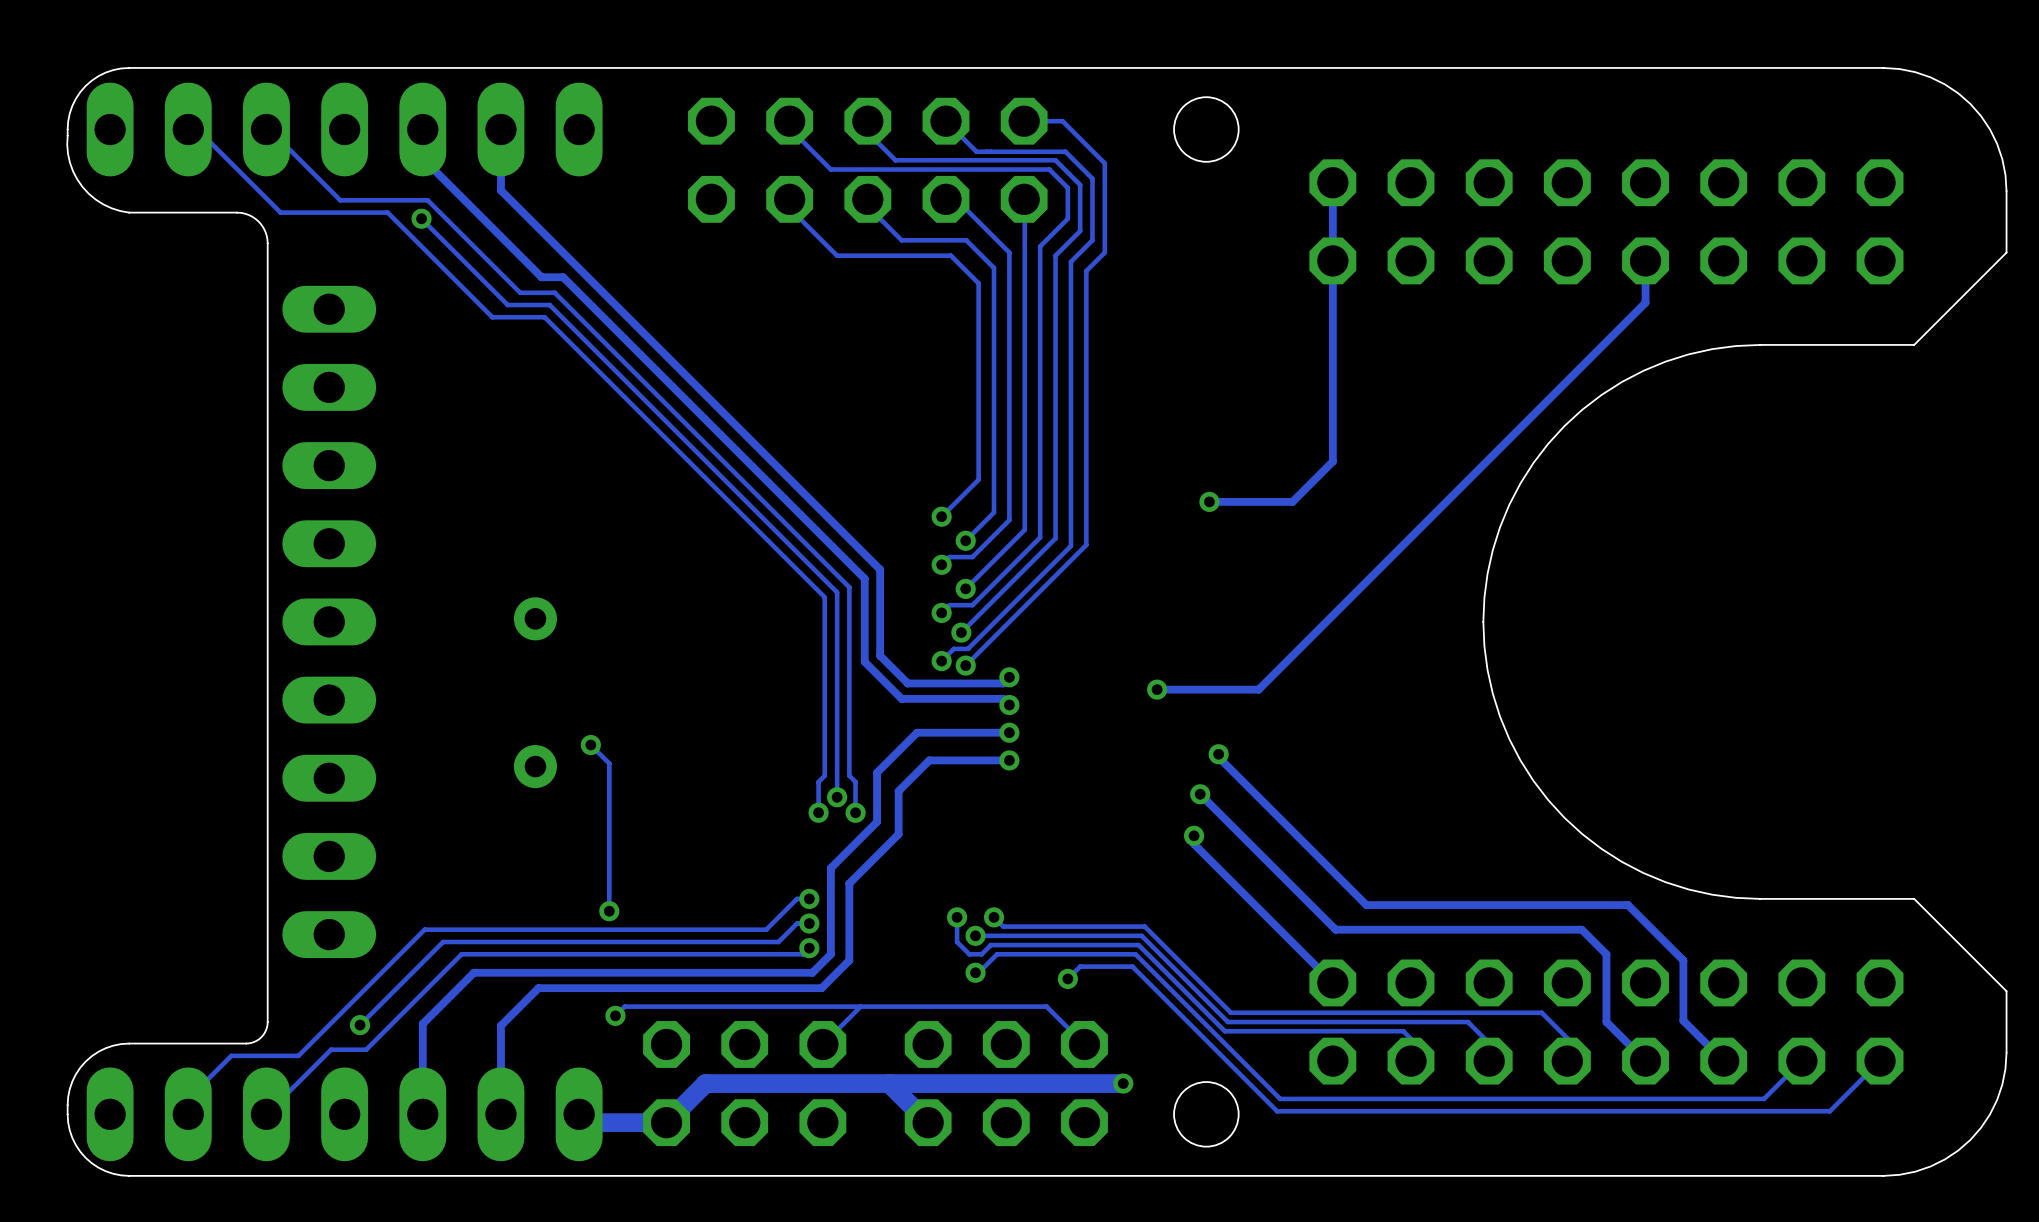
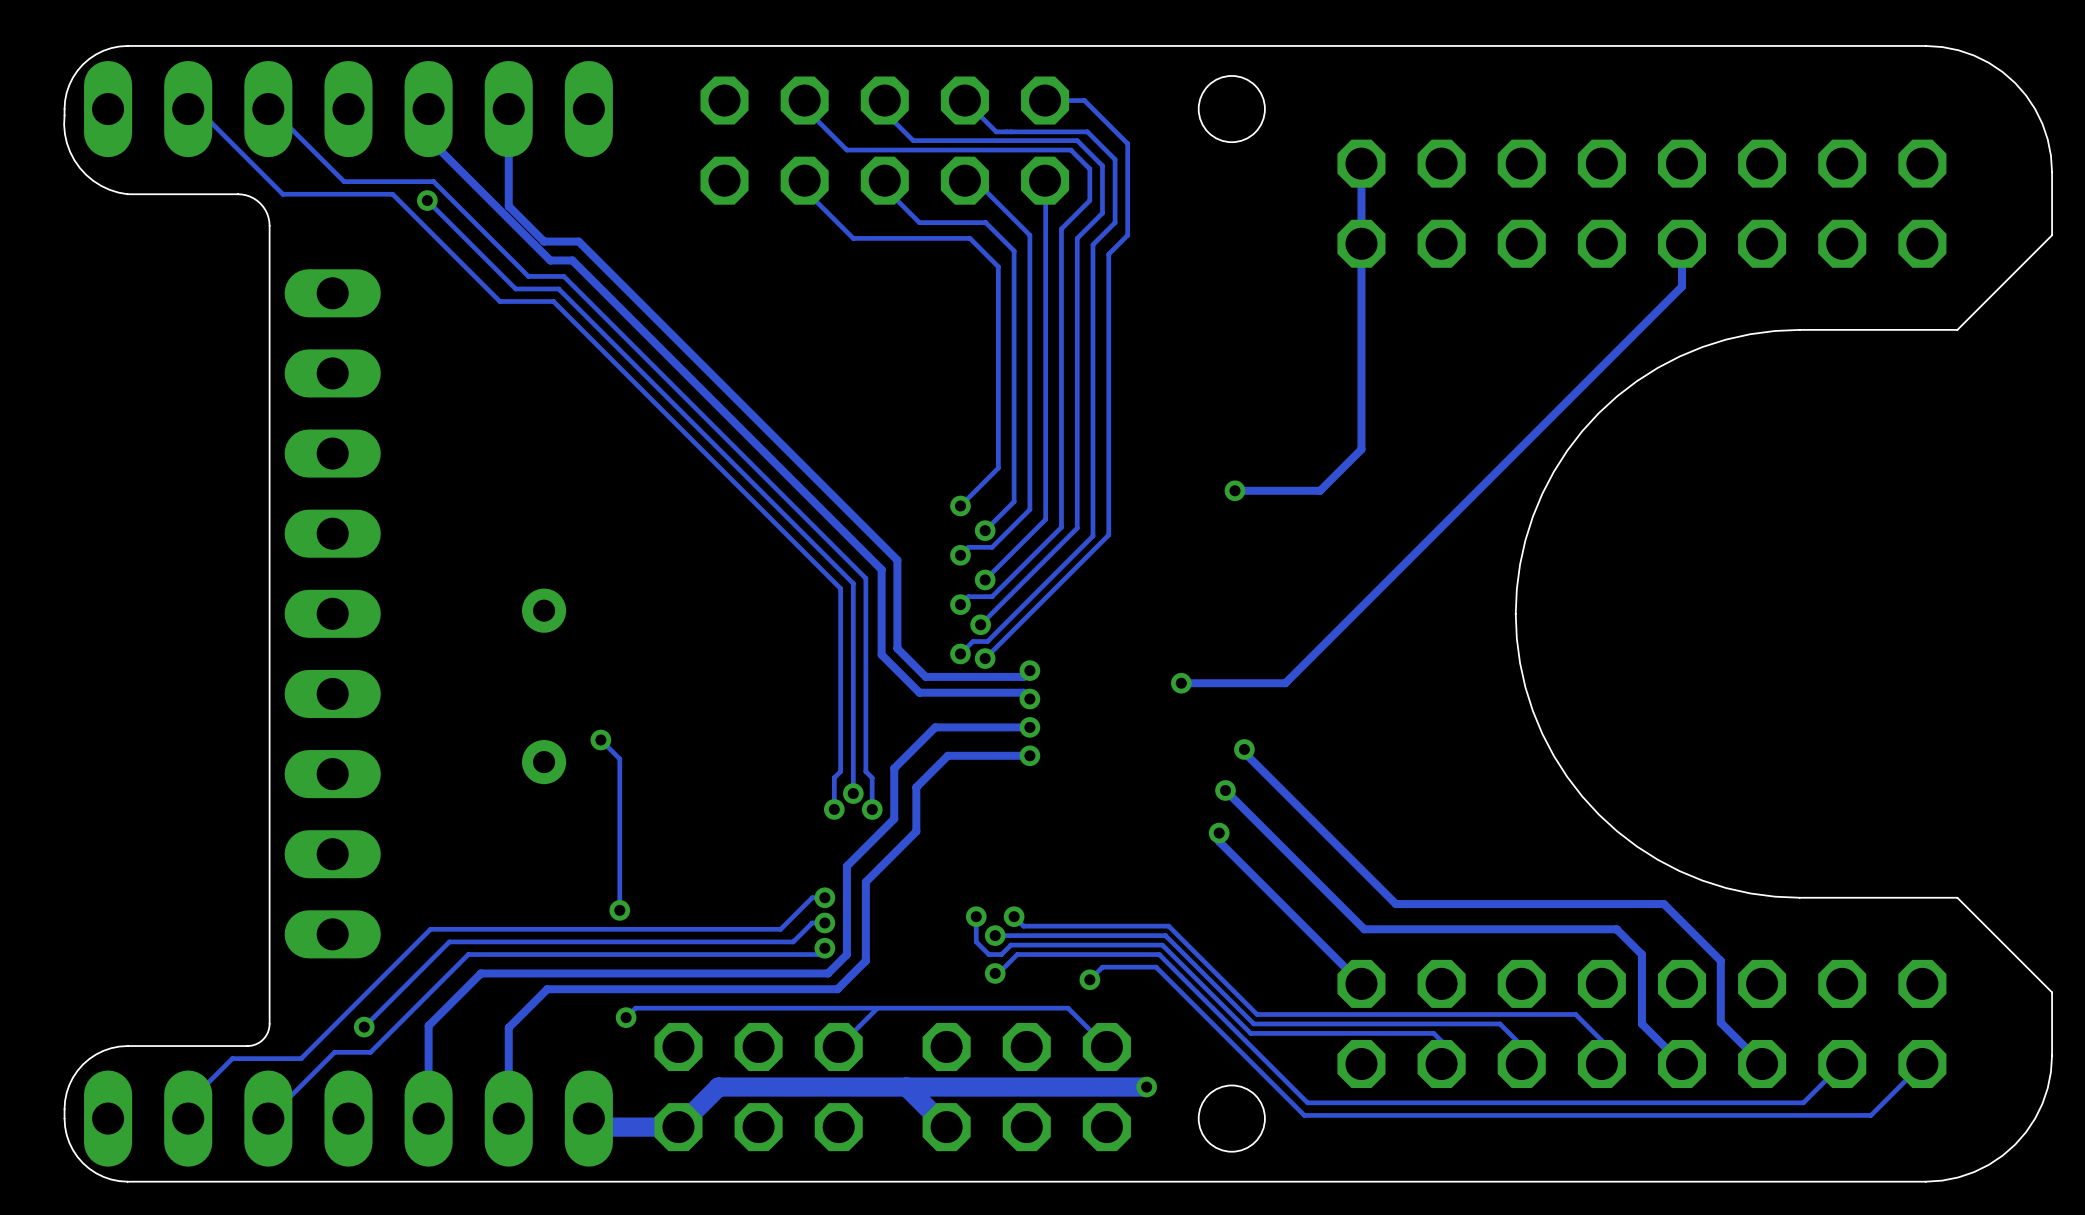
track: (500, 190) (569, 258) -> (508, 171) (508, 206) (544, 241) (578, 241)

